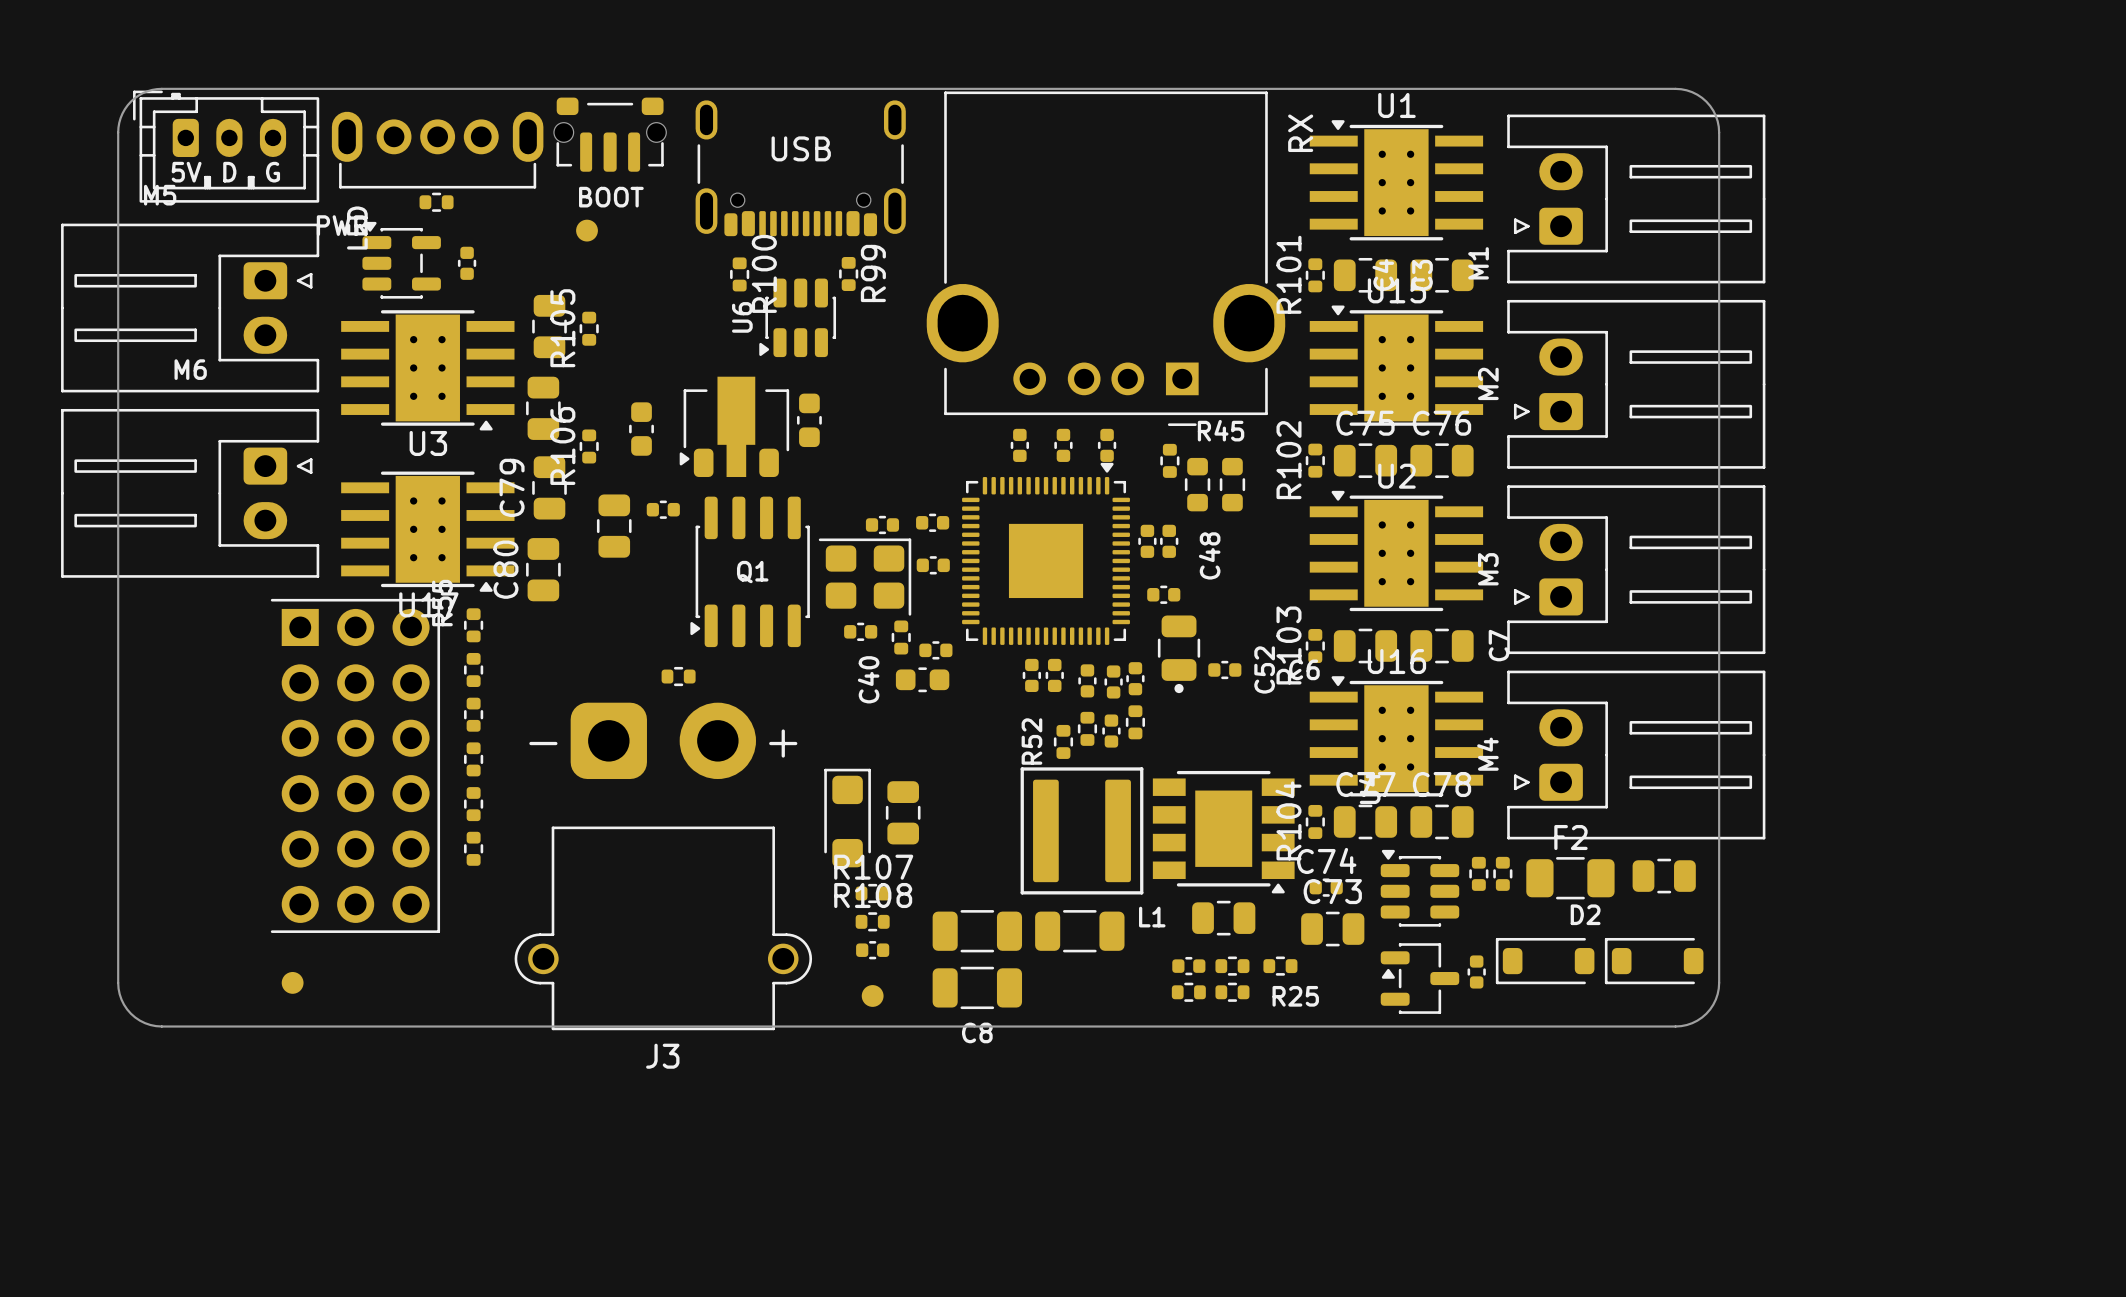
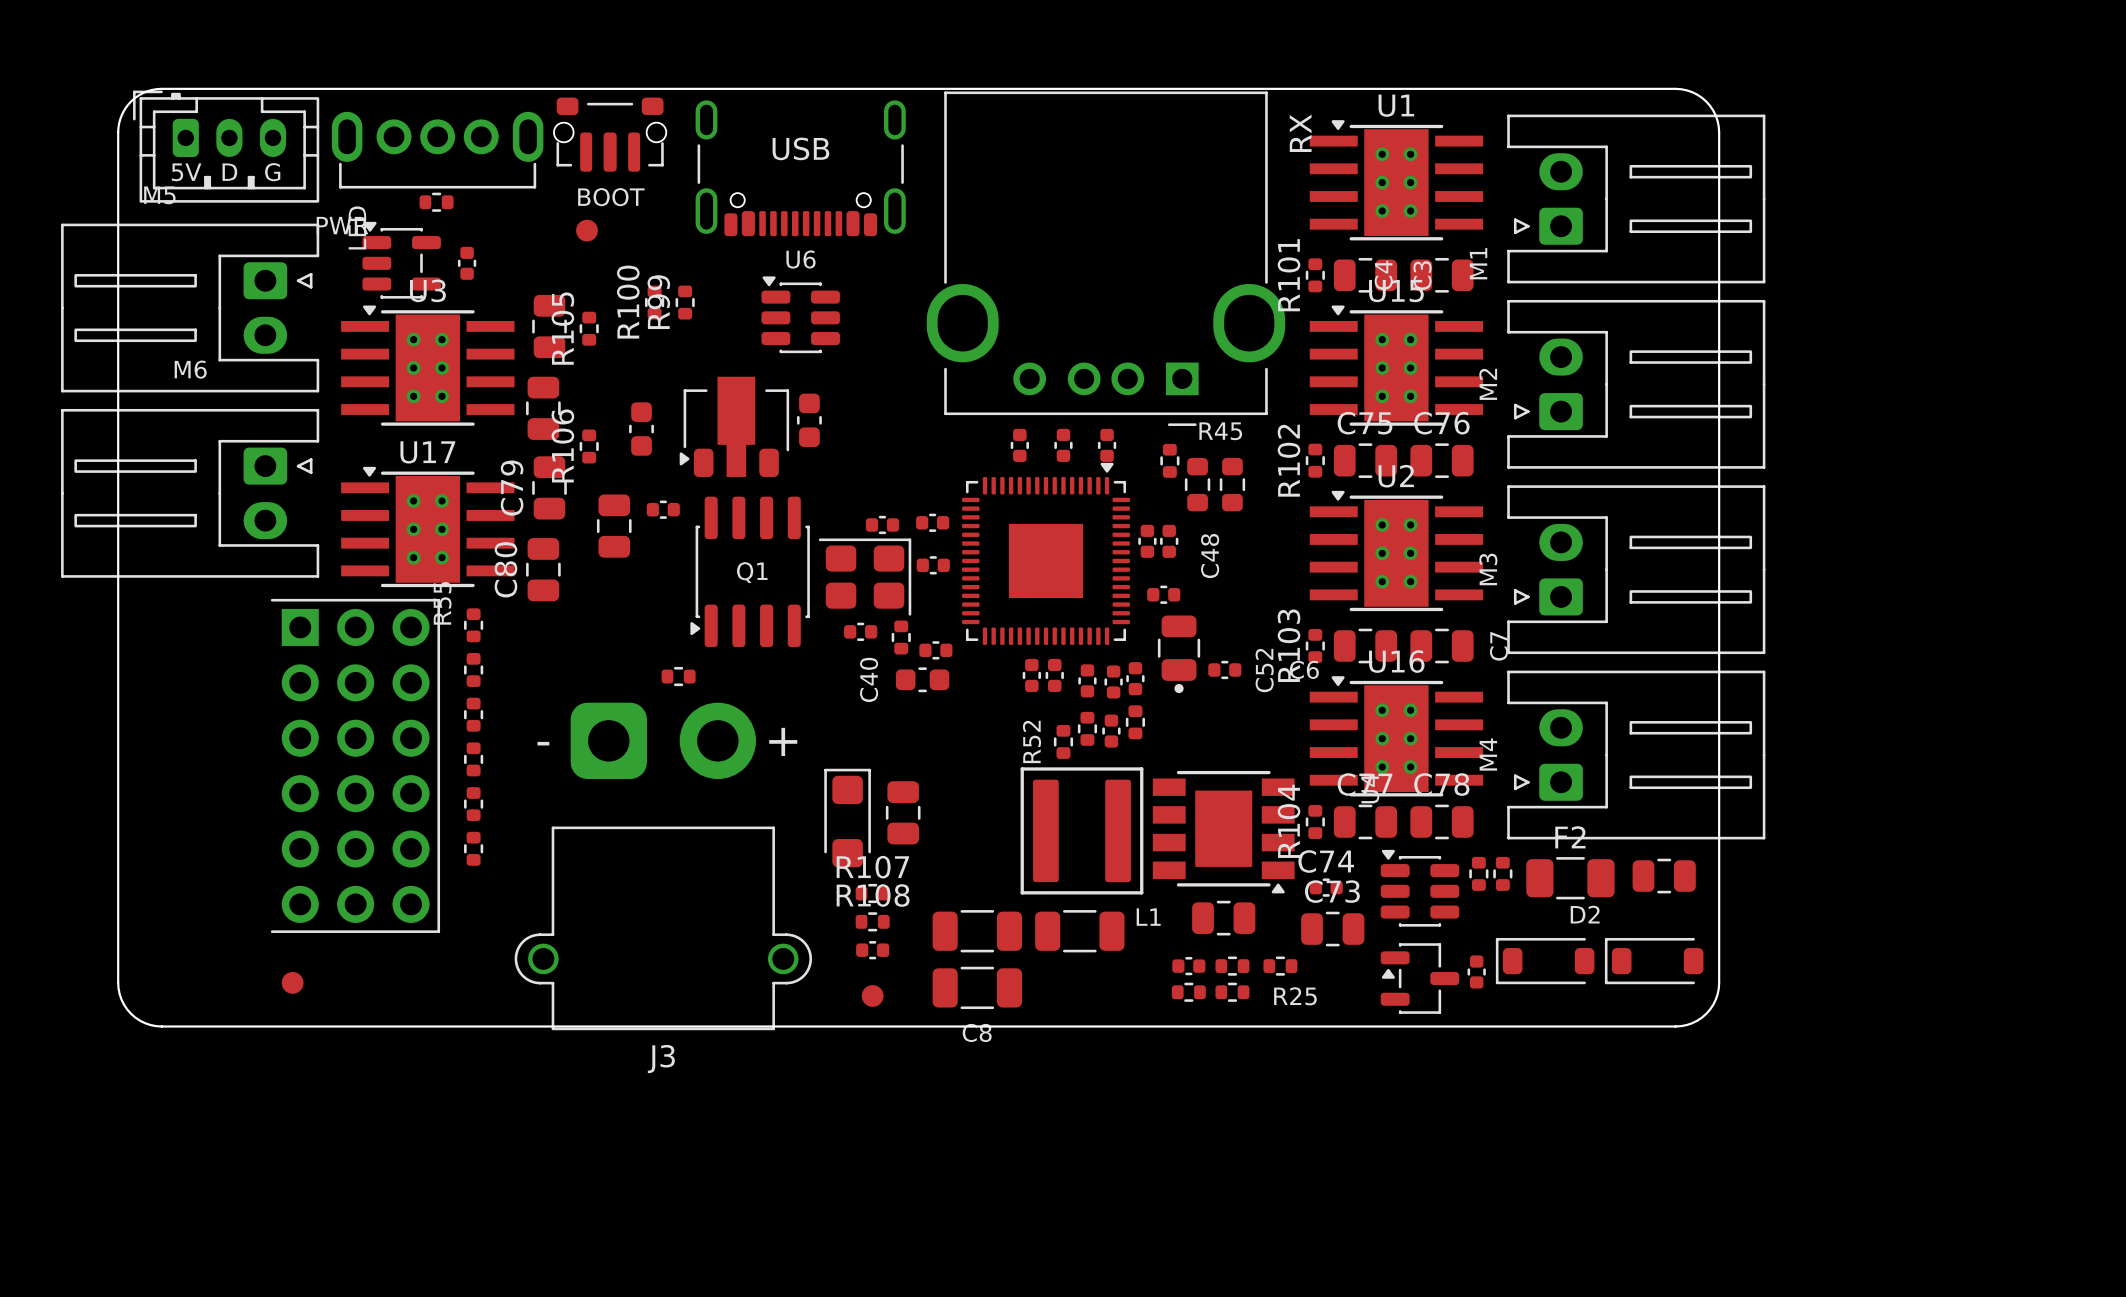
R100 name position: R100 (764, 273) -> R100 (628, 302)
R99 position: (848, 273) -> (685, 302)
R99 name position: R99 (873, 273) -> R99 (658, 302)
R100 position: (739, 274) -> (654, 302)
U6 rotation: 0° (797, 317) -> 90° clockwise (800, 314)
U3 rotation: 0° (427, 370) -> 180° (427, 365)
U17 rotation: 0° (427, 531) -> 180° (427, 526)

